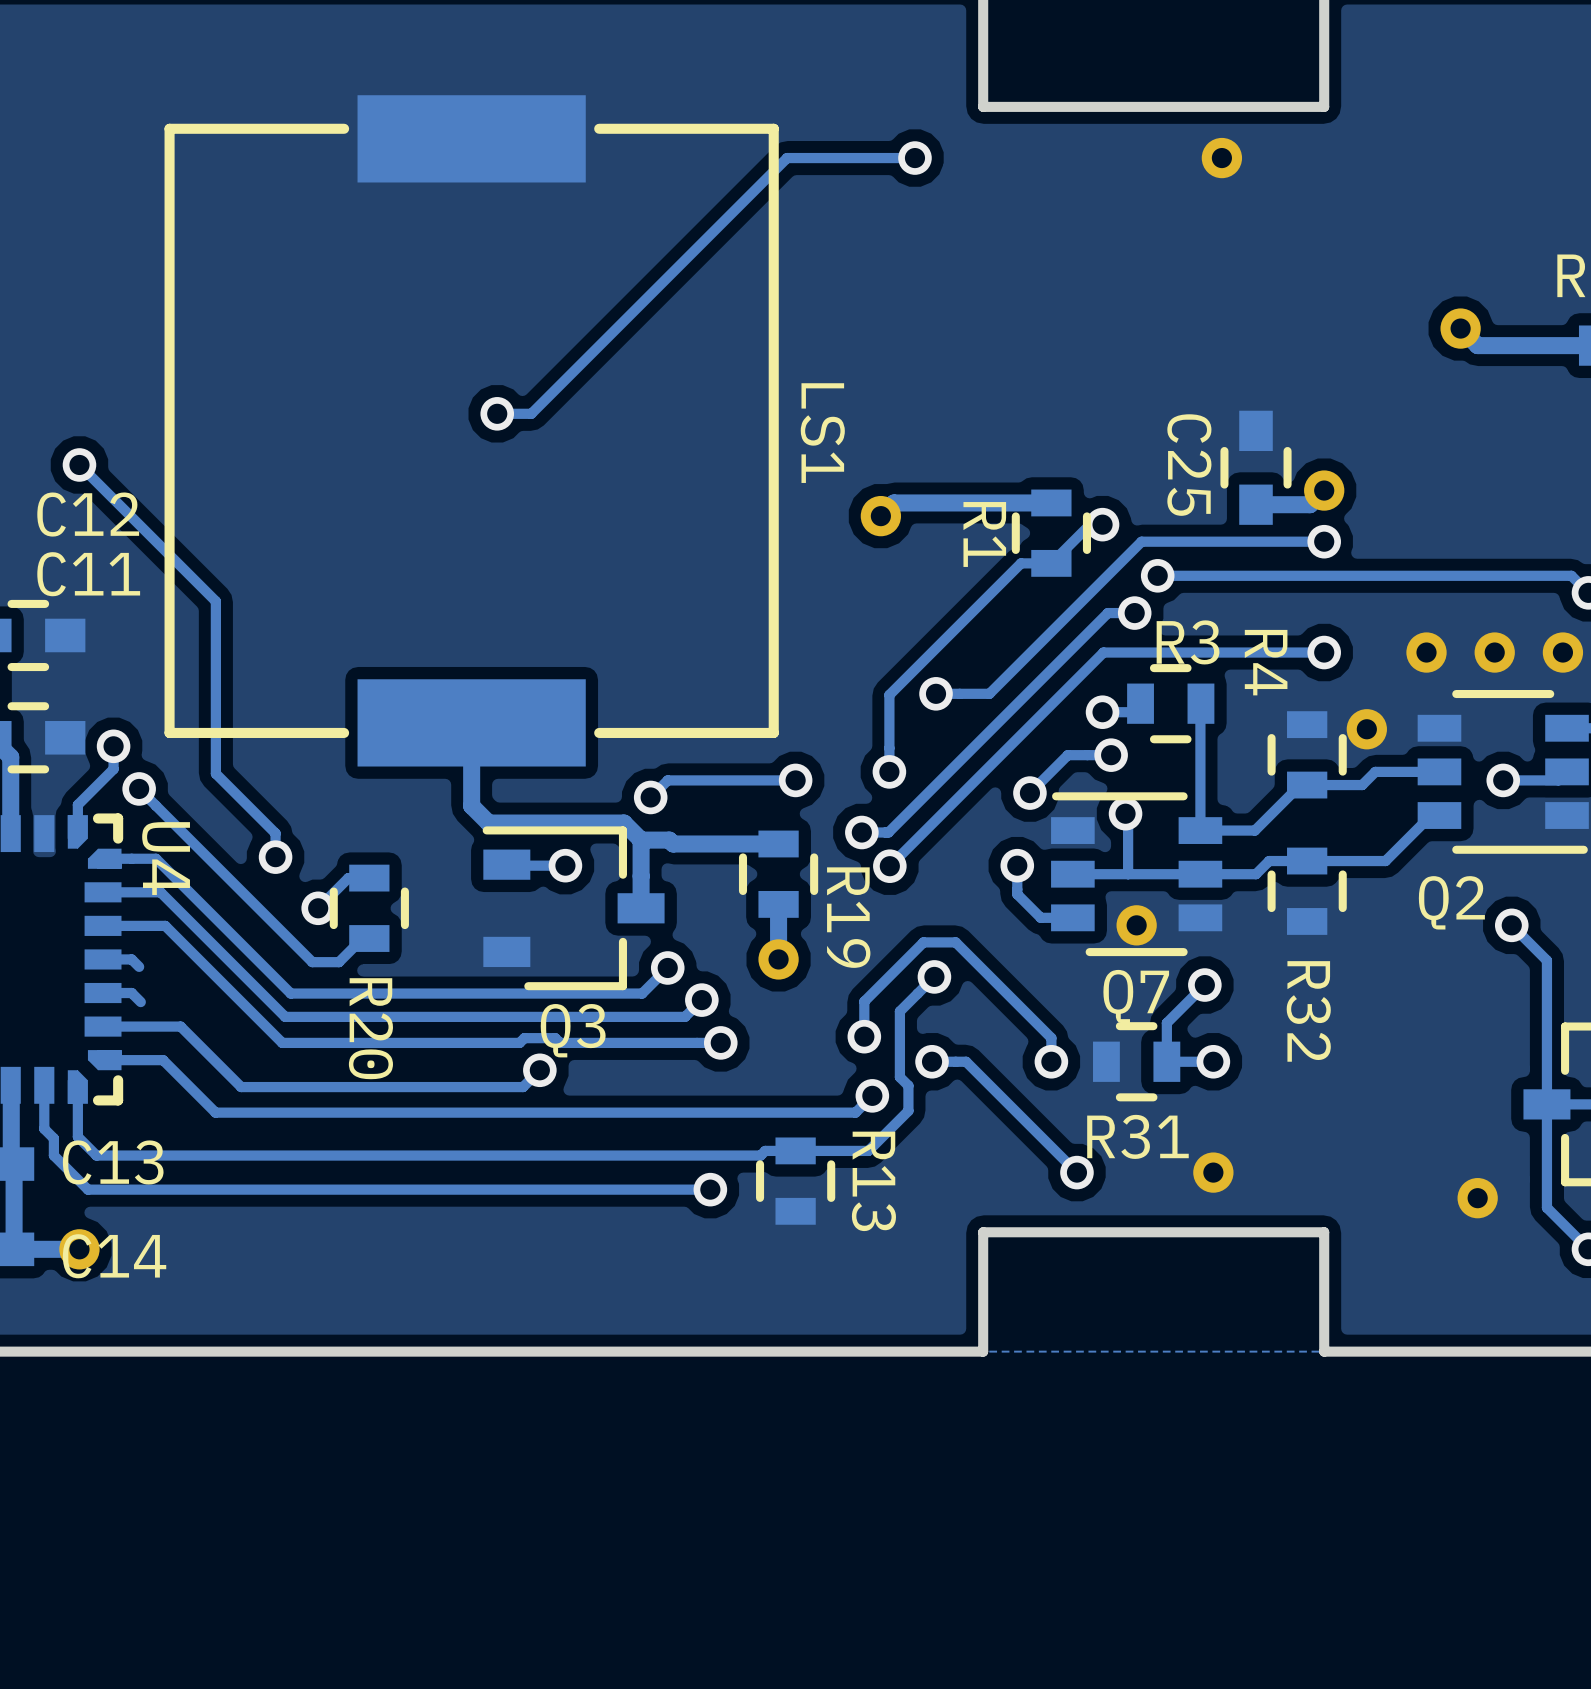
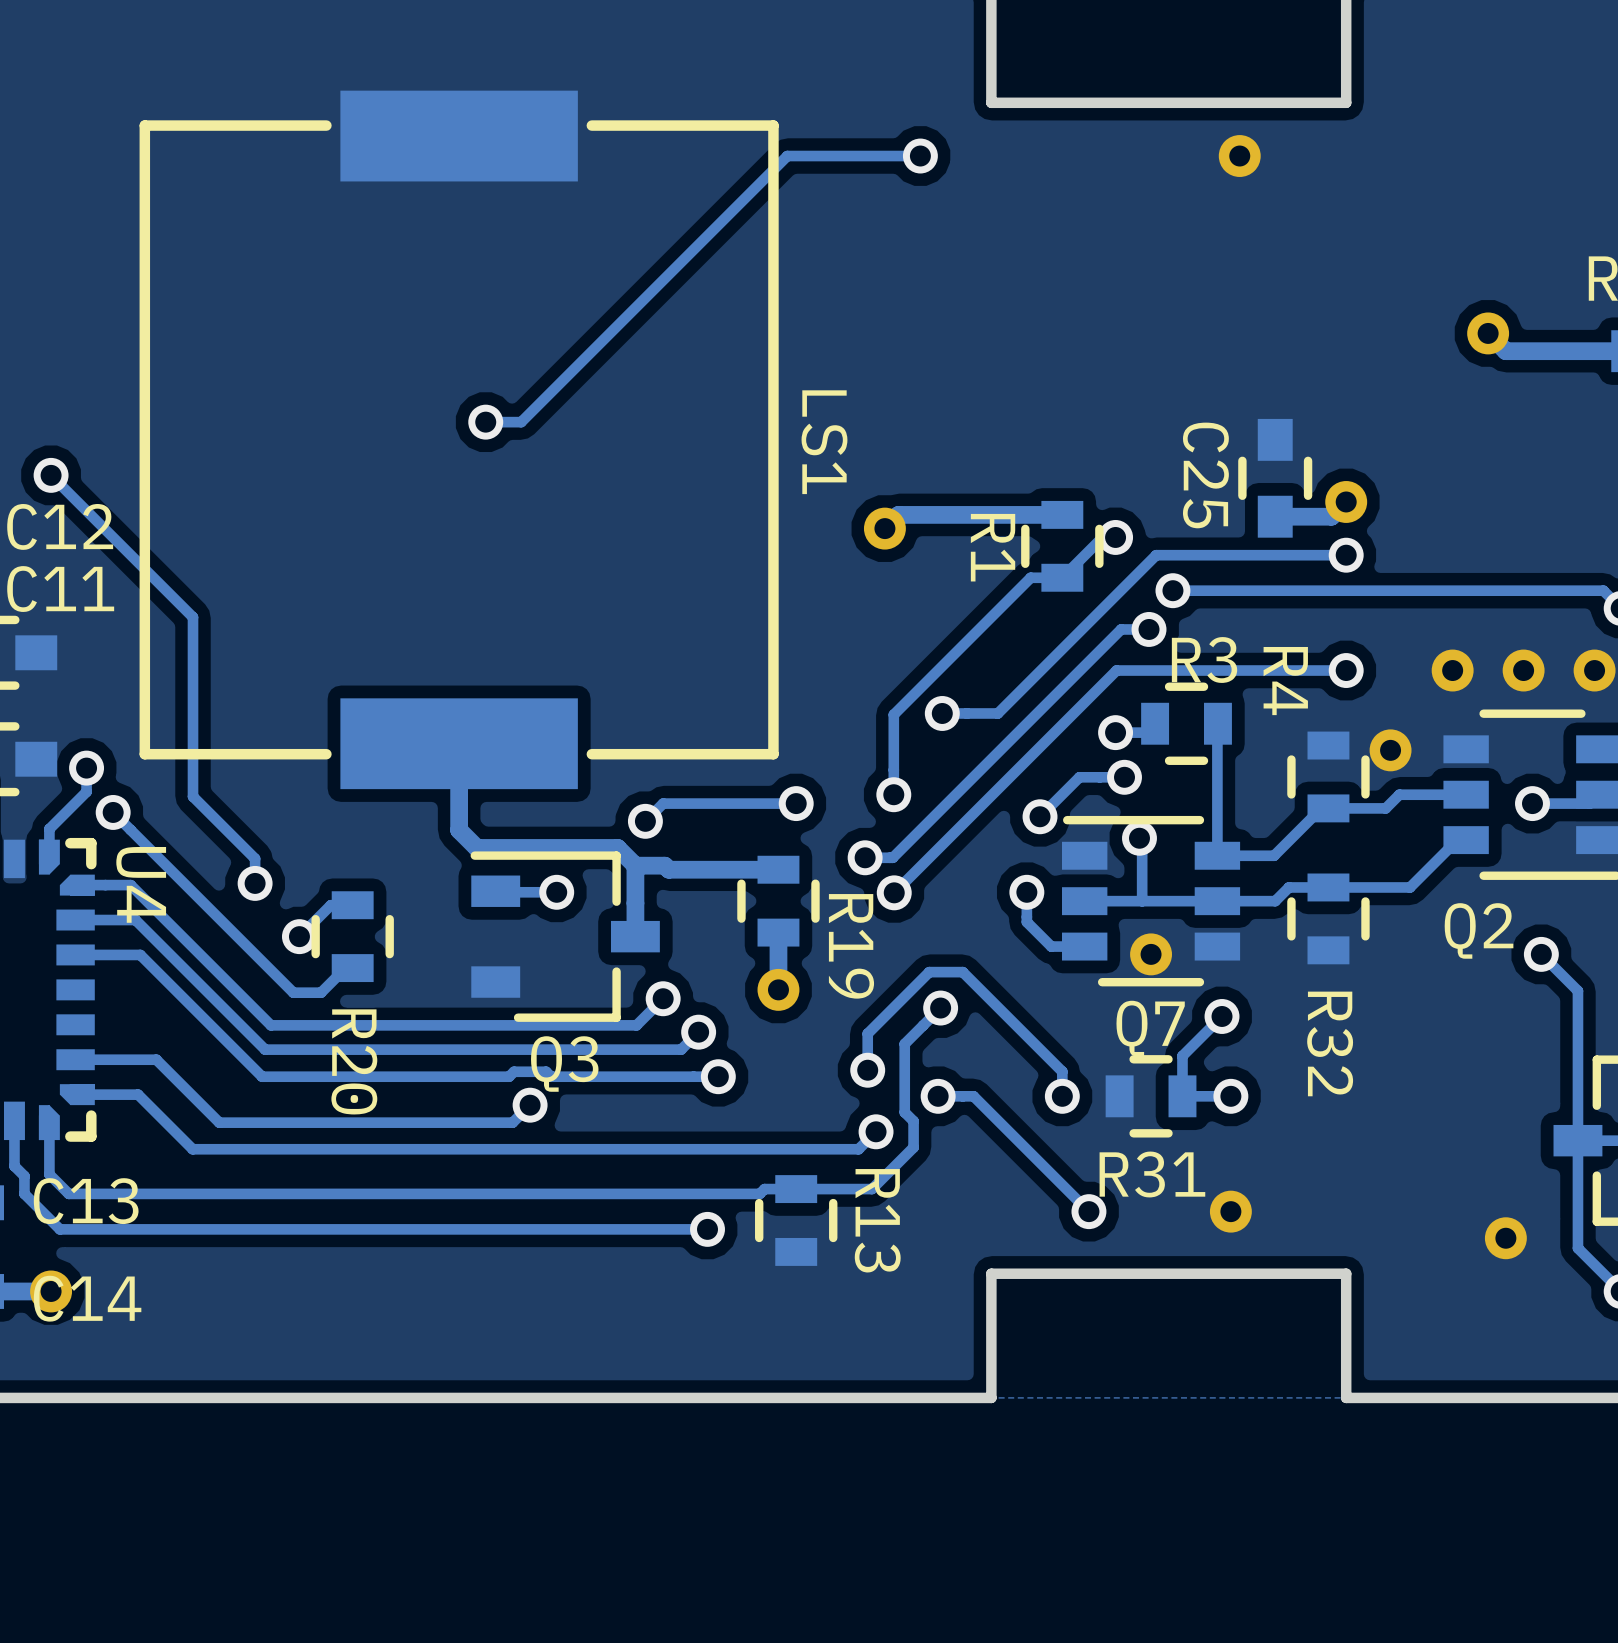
track: (103, 959) (131, 959) (139, 966) -> none
track: (103, 993) (131, 993) (140, 1002) -> none

